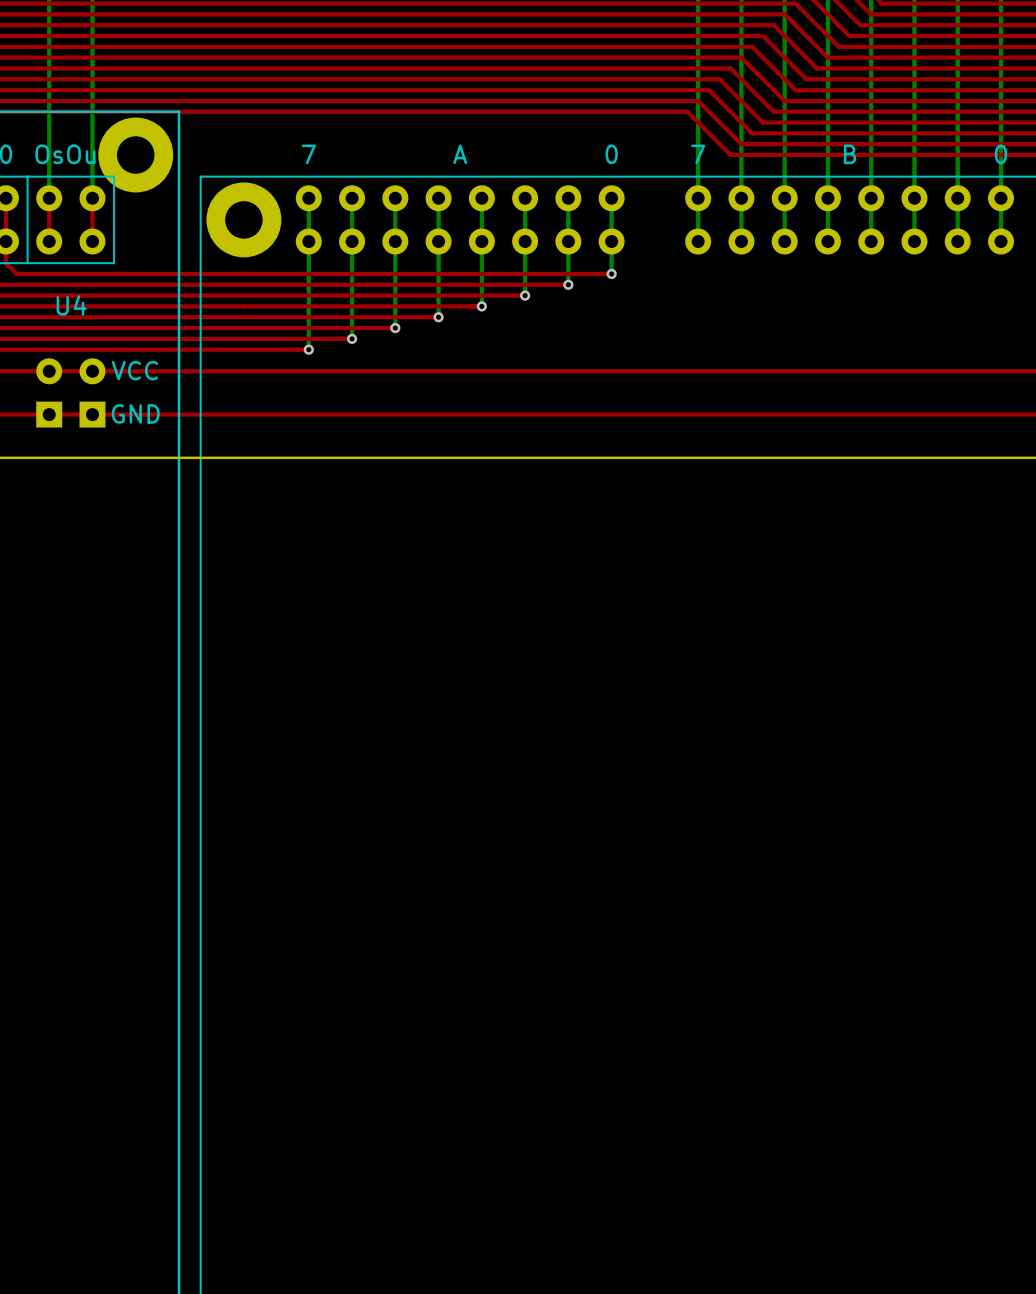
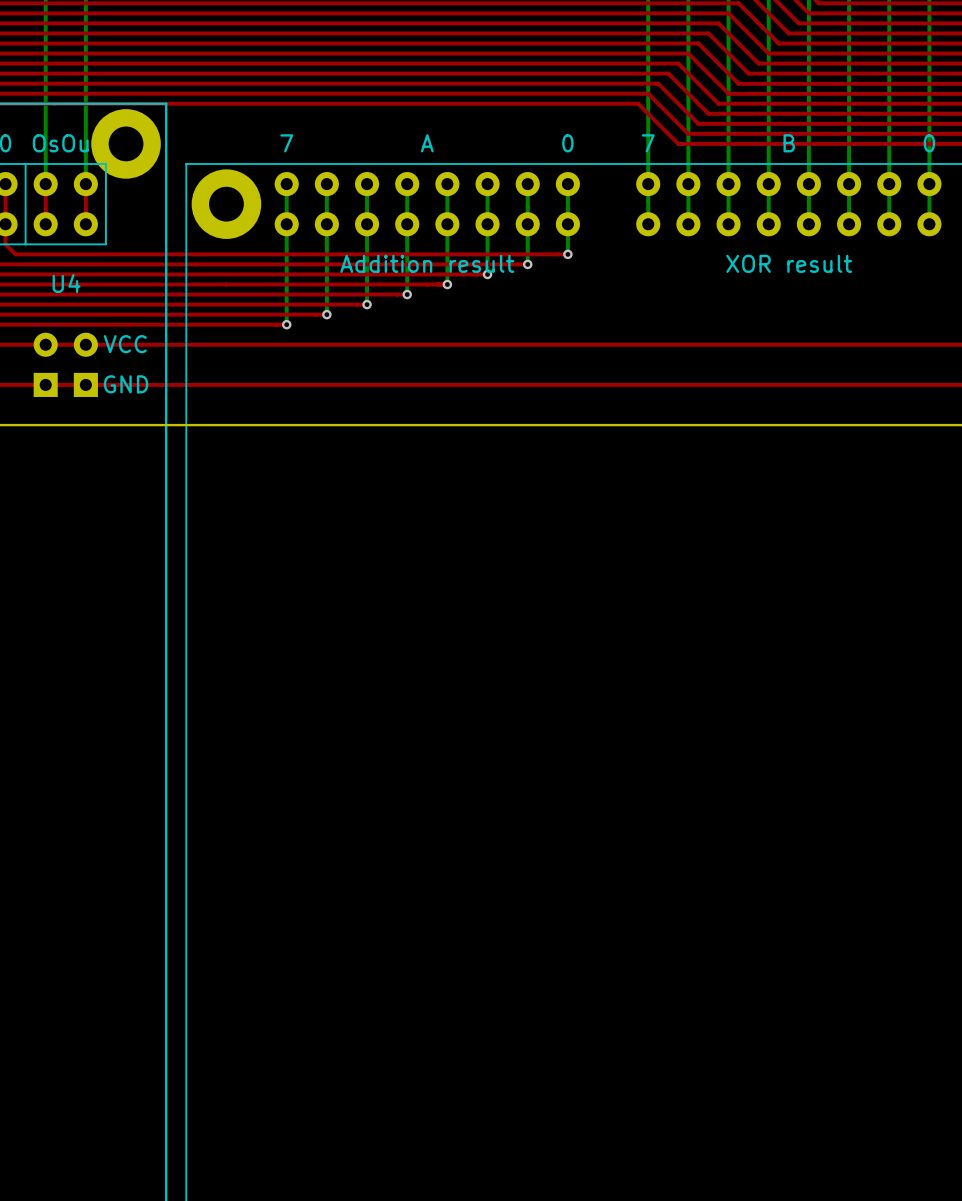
text: none -> Addition result (427, 263)
text: none -> XOR result (789, 263)

